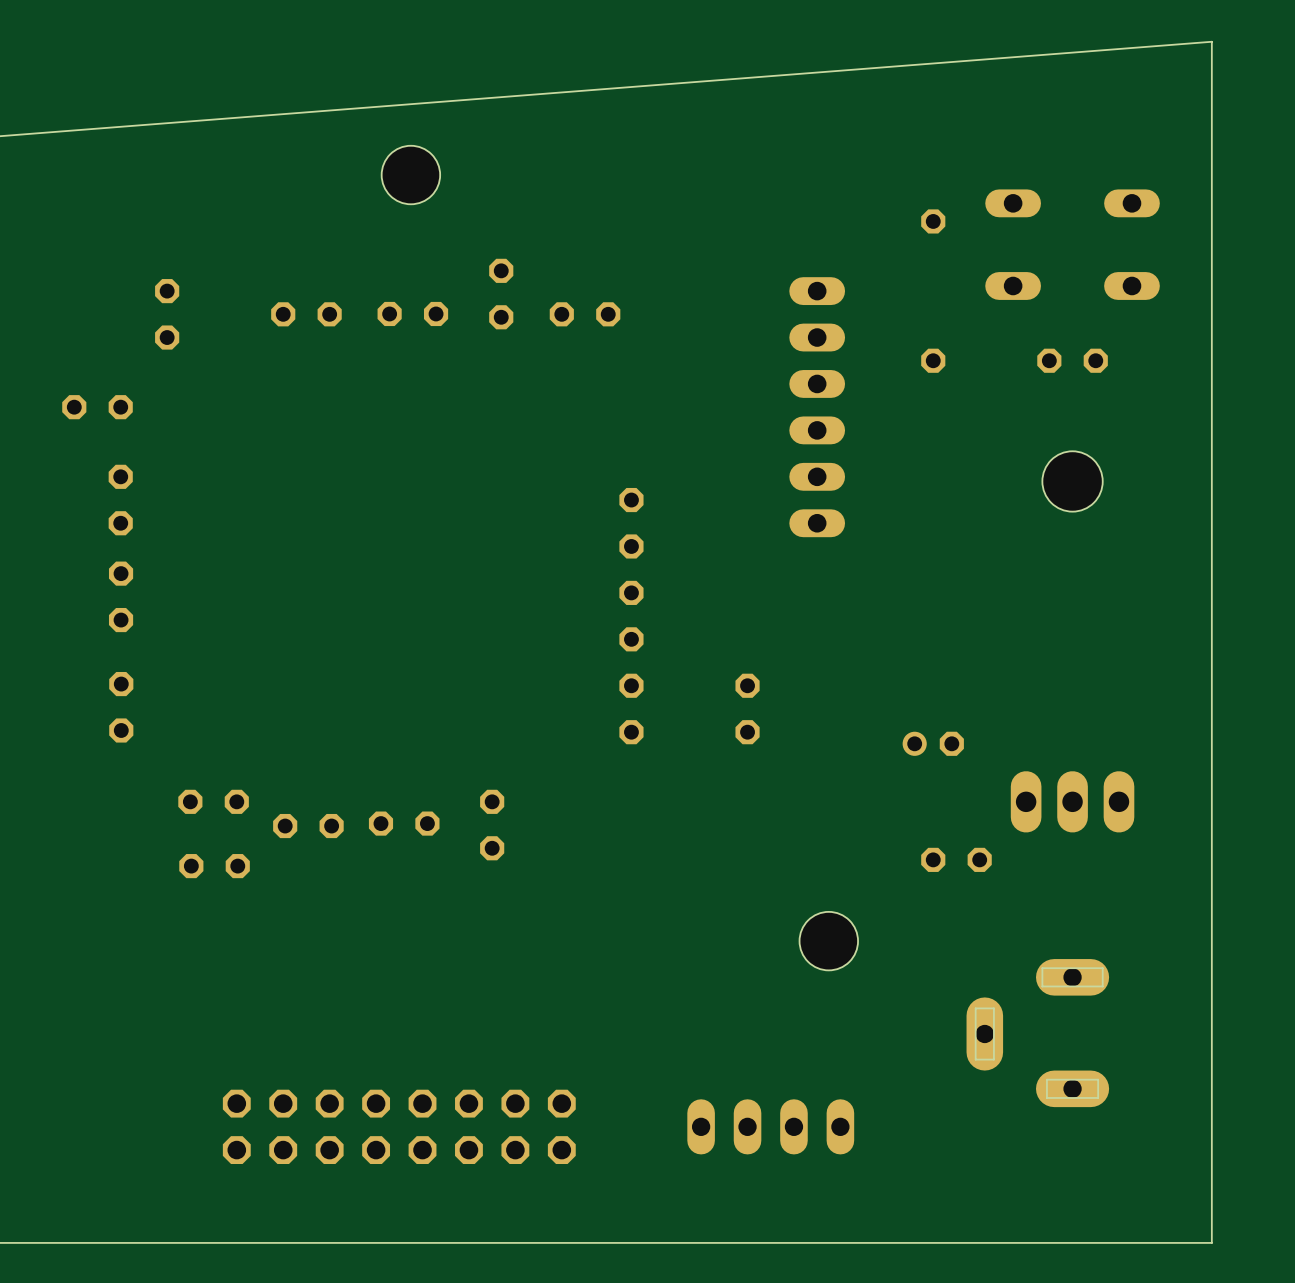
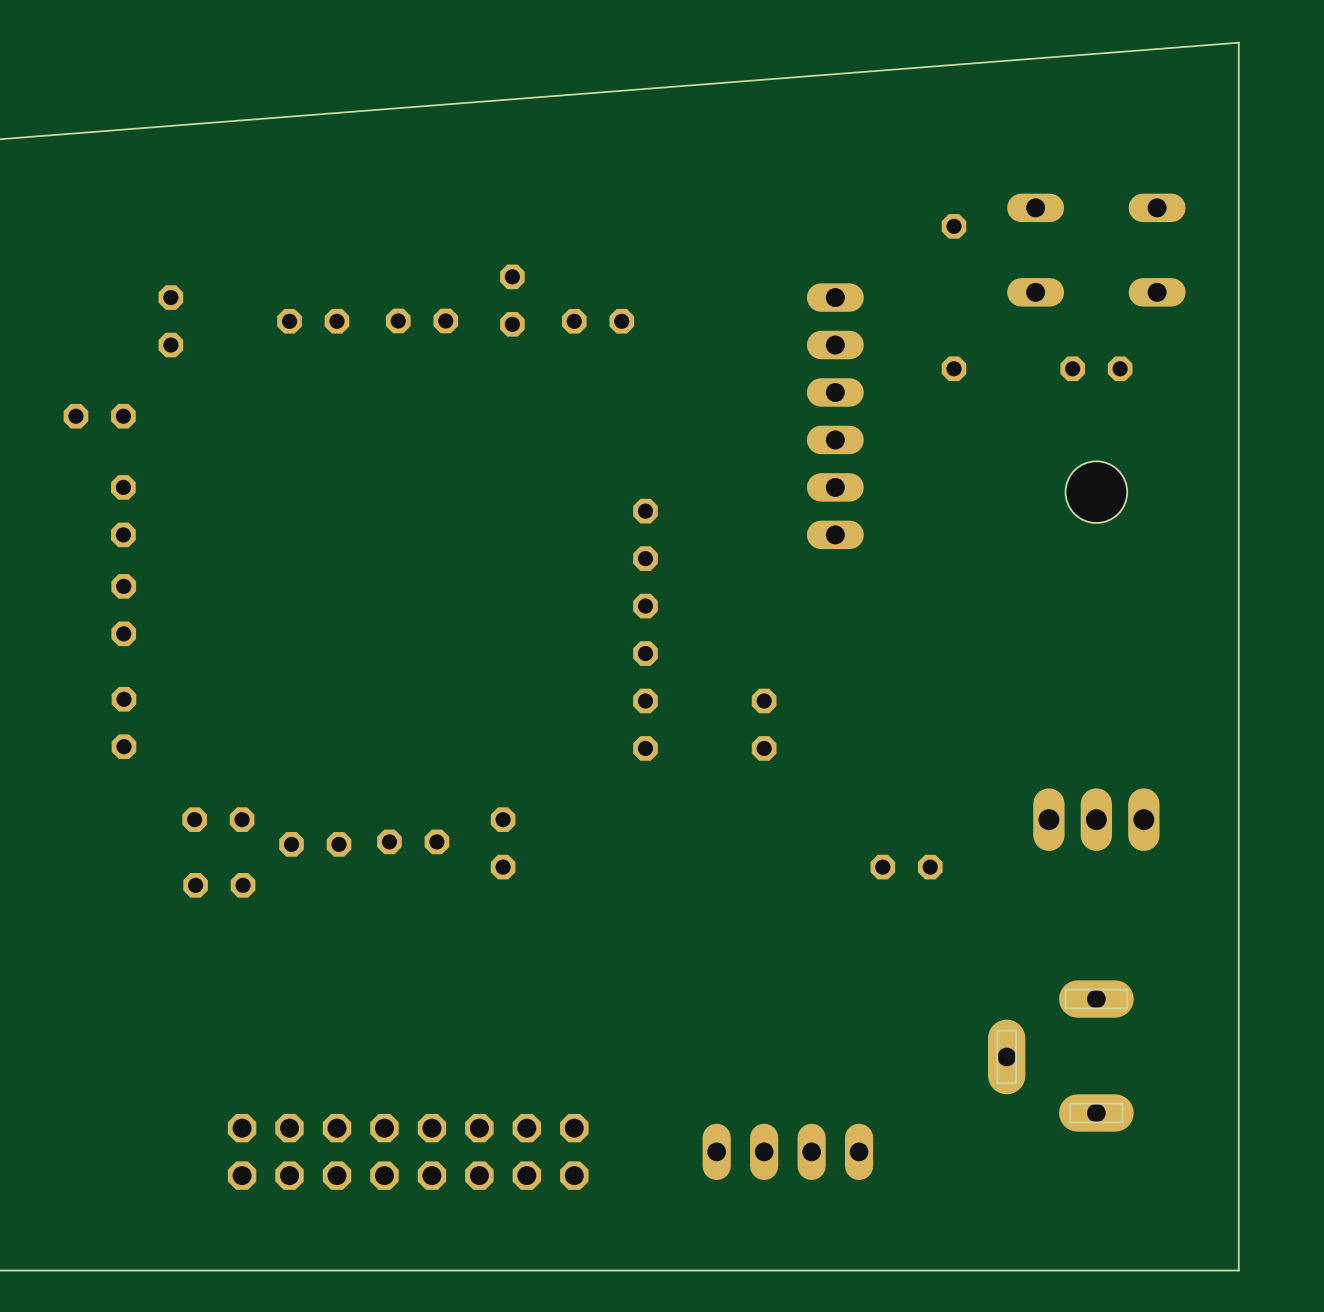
hole: (410, 175) -> none
part: (933, 743) -> none
part position: (956, 859) -> (906, 867)
hole: (828, 941) -> none

